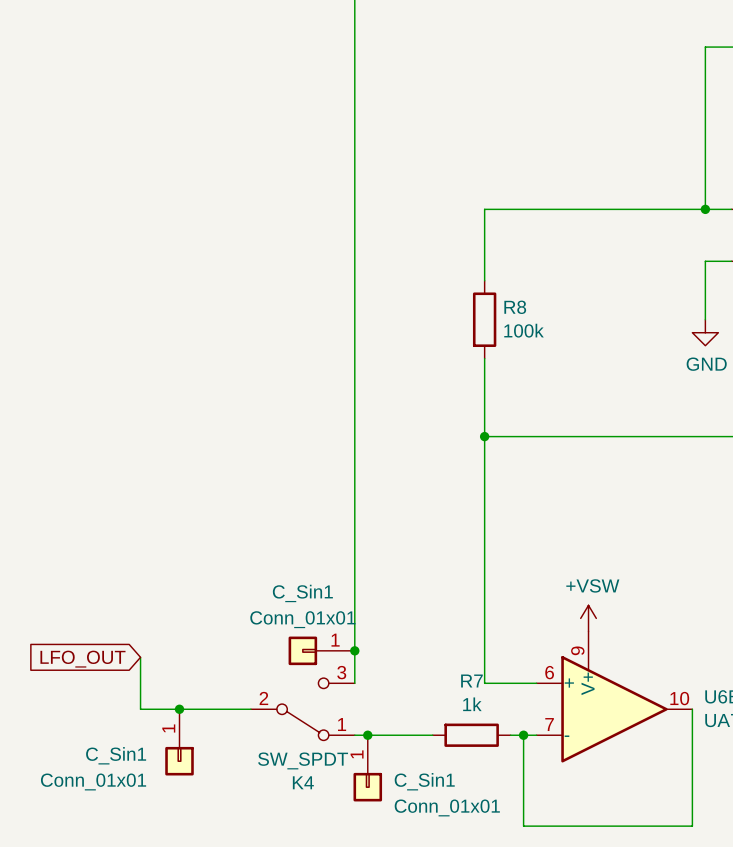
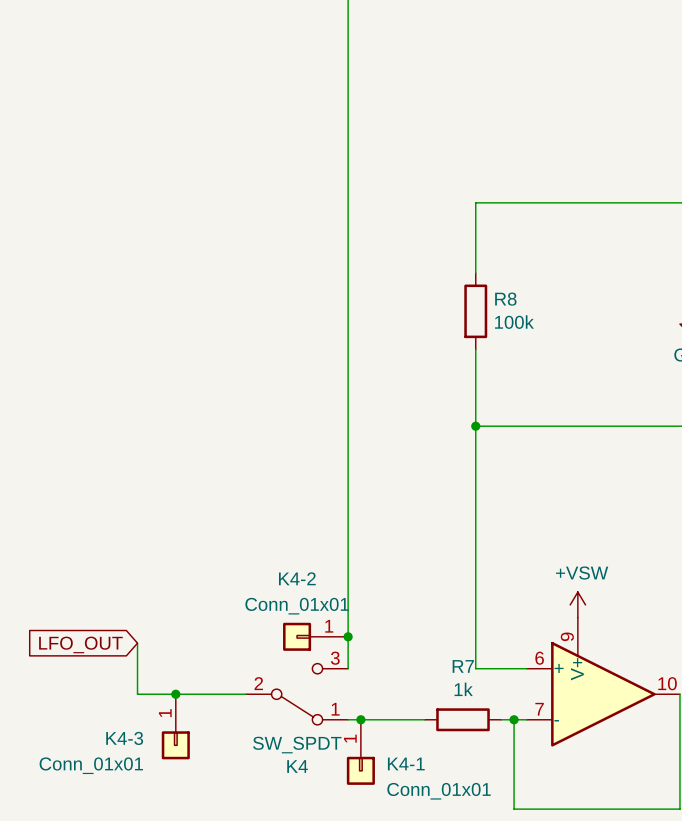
C_Sin1 name: C_Sin1 (302, 593) -> K4-2 (297, 578)
C_Sin1 name: C_Sin1 (116, 755) -> K4-3 (124, 738)
C_Sin1 name: C_Sin1 (424, 781) -> K4-1 (406, 763)

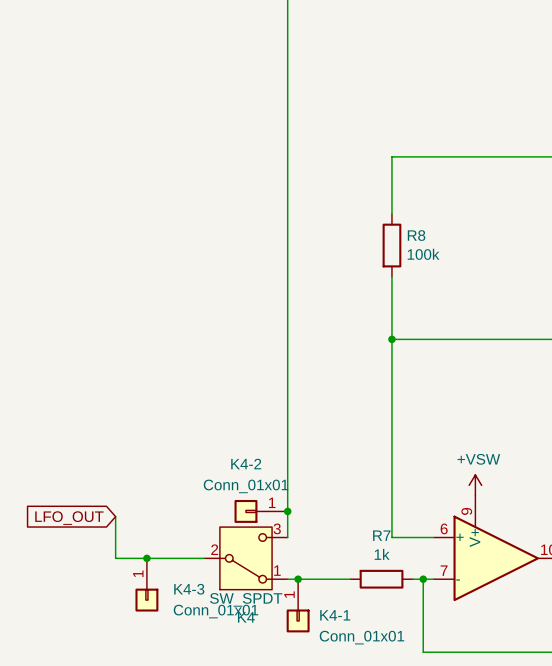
K4 symbol: [246, 663, 349, 725] -> [204, 527, 288, 590]
K4-3 name position: K4-3 (124, 738) -> K4-3 (189, 589)
K4-3 value position: Conn_01x01 (91, 765) -> Conn_01x01 (215, 611)

